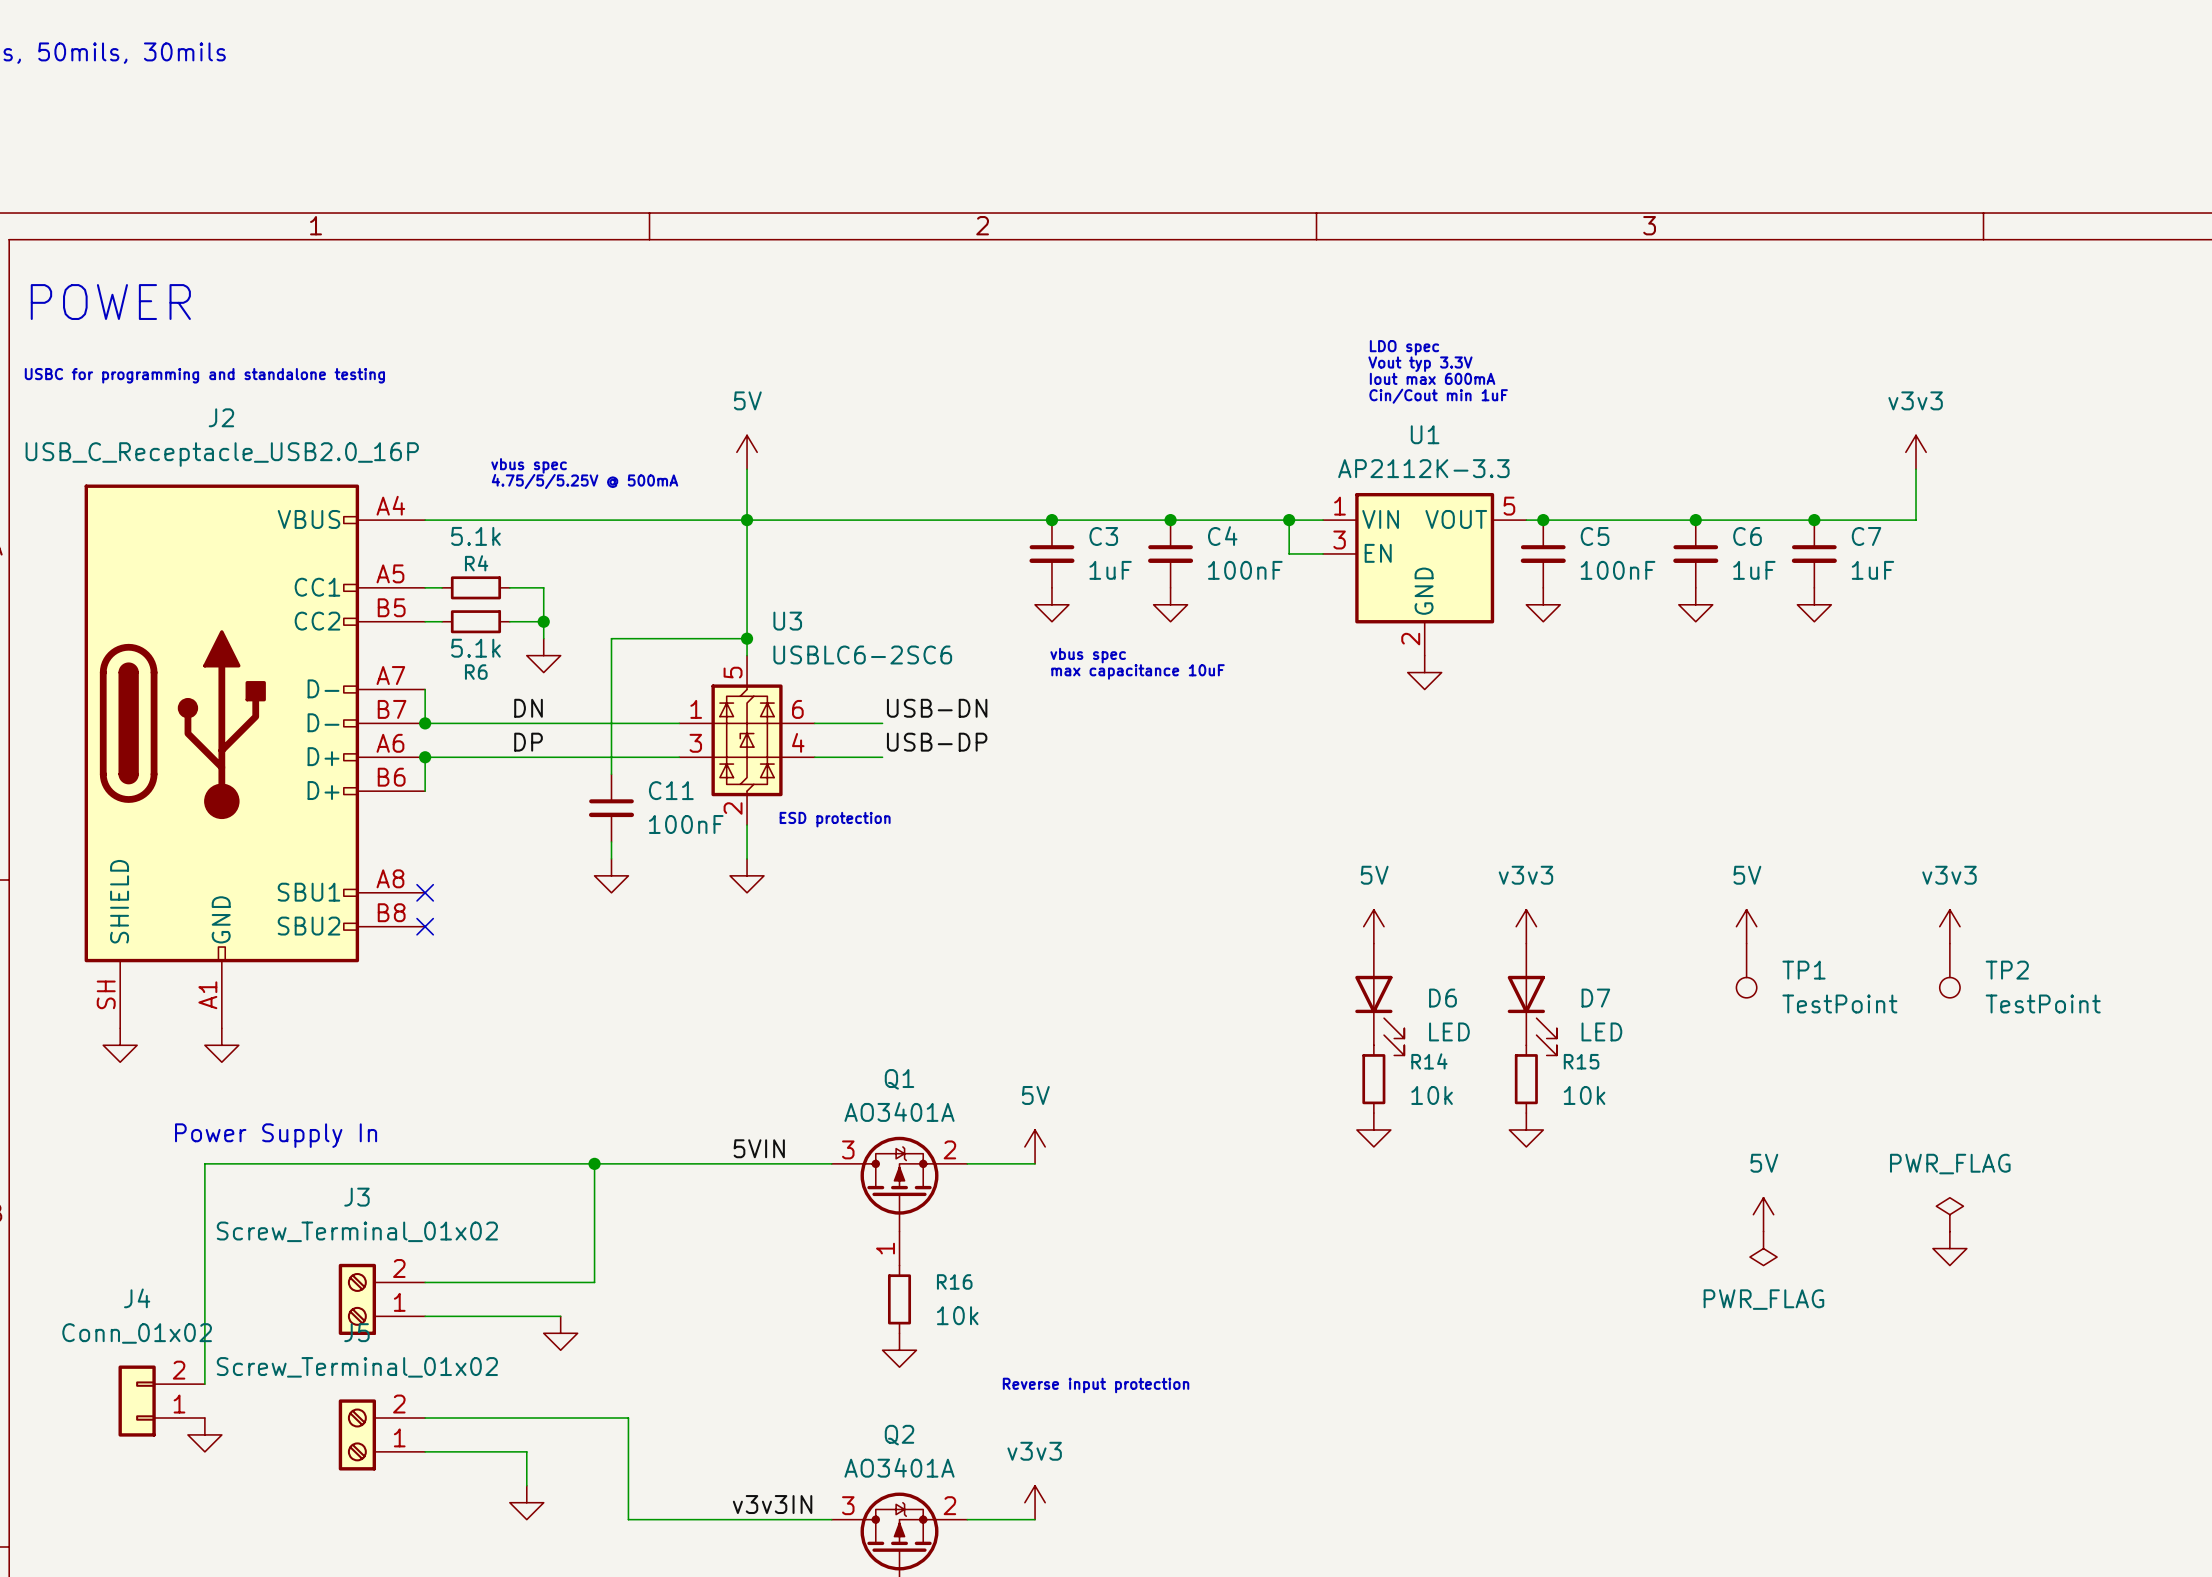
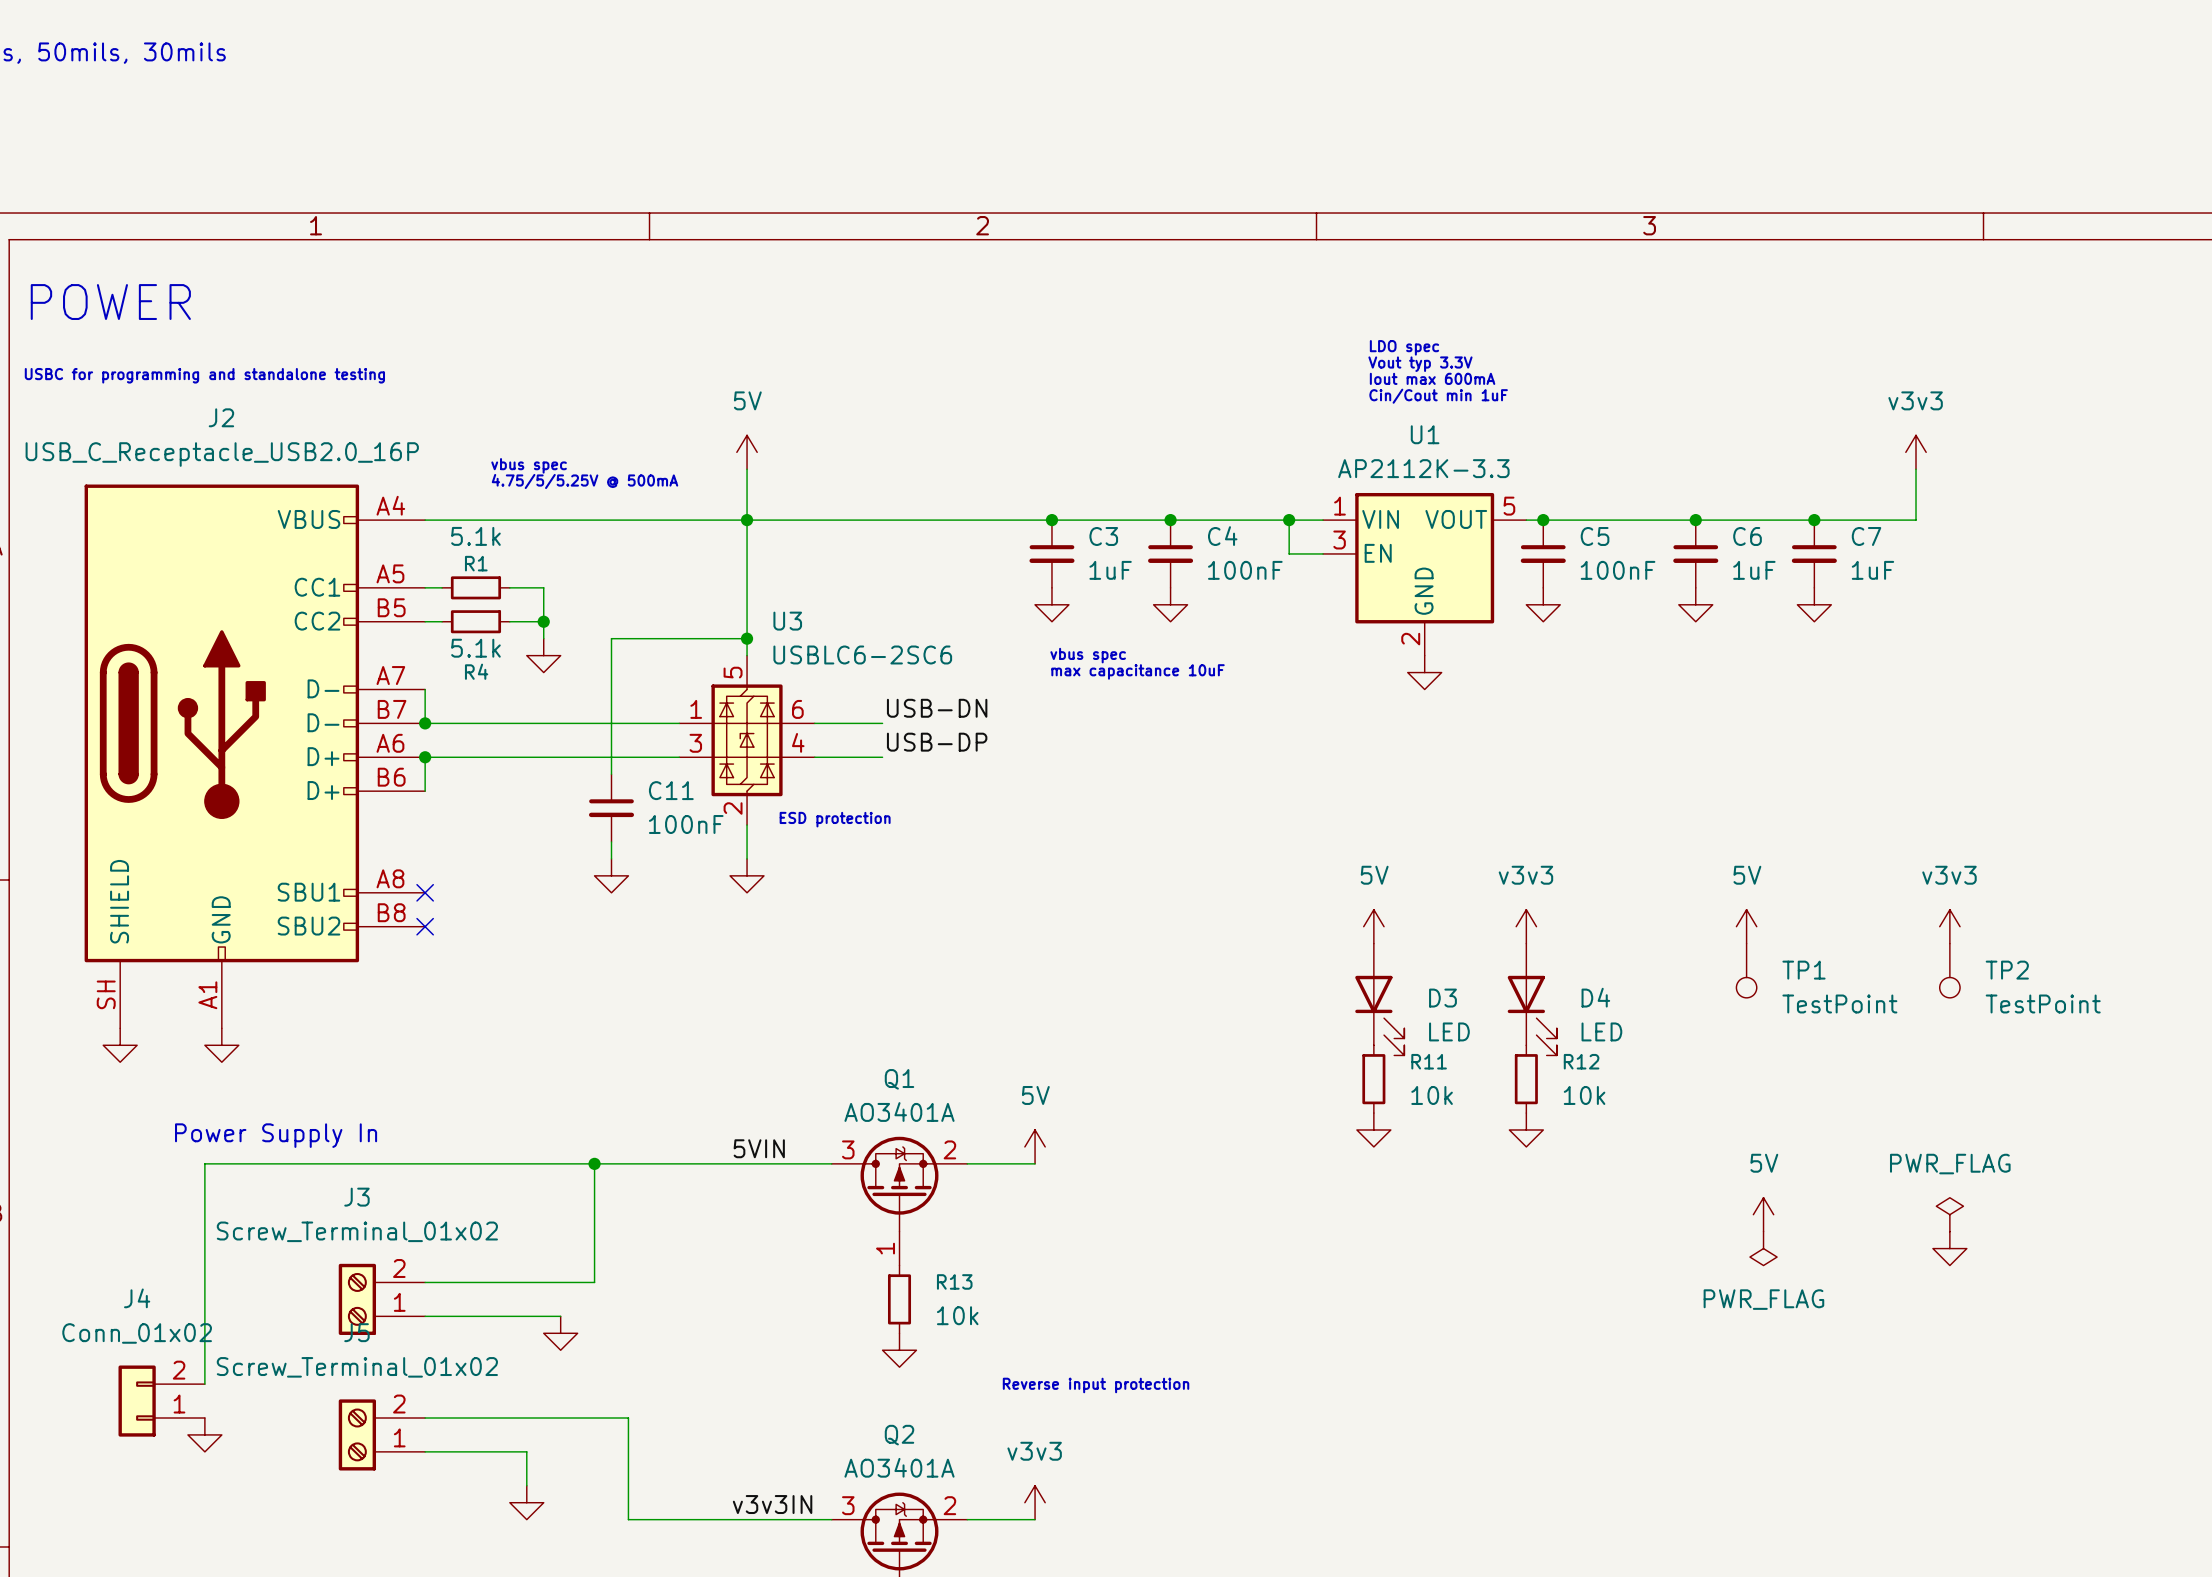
R4 name: R4 (476, 563) -> R1 (476, 563)
R6 name: R6 (476, 672) -> R4 (476, 671)
label: DN (528, 708) -> none
label: DP (528, 742) -> none
D6 name: D6 (1442, 998) -> D3 (1442, 998)
D7 name: D7 (1595, 998) -> D4 (1595, 997)
R14 name: R14 (1429, 1061) -> R11 (1429, 1061)
R15 name: R15 (1581, 1061) -> R12 (1581, 1061)
R16 name: R16 (954, 1281) -> R13 (954, 1281)

